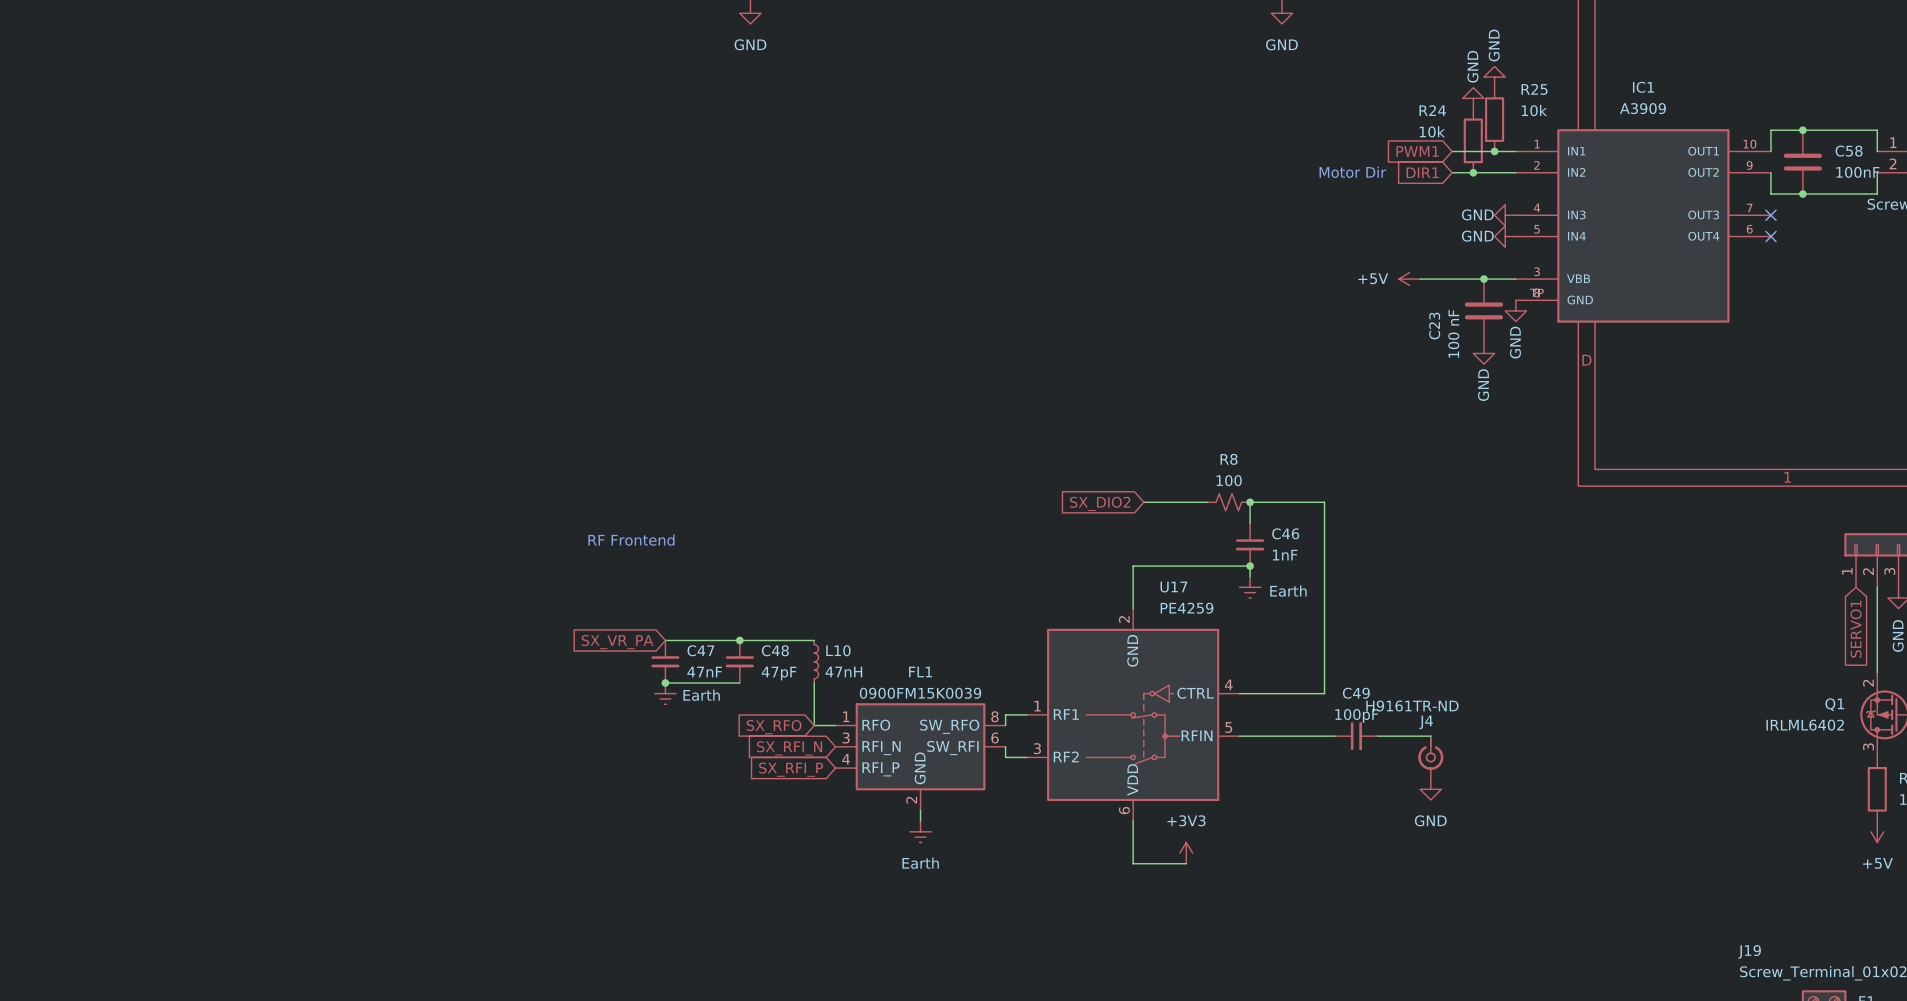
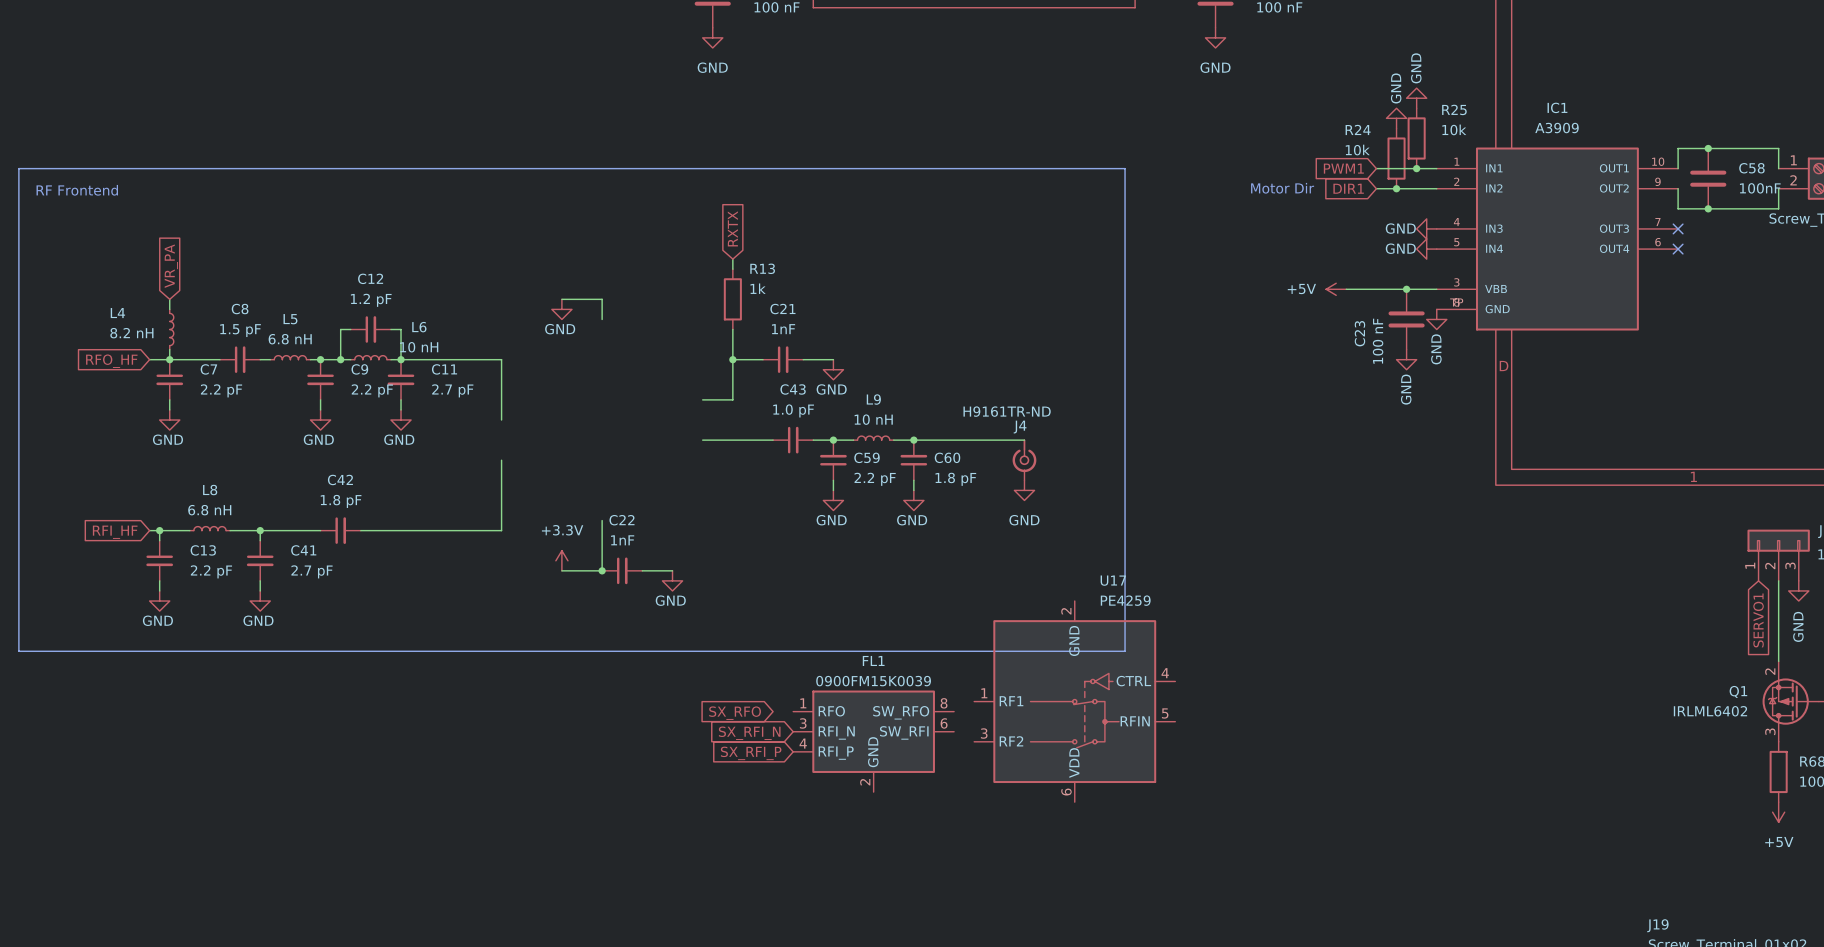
line: none -> (18, 168) (1125, 168) (1125, 651) (18, 651) (18, 168)
text: none -> RF Frontend (77, 190)
global label: none -> RXTX (732, 228)
wire: none -> (732, 259) (732, 269)
global label: none -> VR_PA (171, 266)
wire: none -> (169, 299) (169, 309)
wire: none -> (561, 299) (602, 299) (602, 319)
R13: none -> 1k (732, 299)
power symbol: none -> GND (561, 309)
L4: none -> 8.2 nH (171, 329)
wire: none -> (350, 329) (340, 329) (340, 359)
C12: none -> 1.2 pF (370, 329)
wire: none -> (390, 329) (401, 329) (401, 359)
wire: none -> (732, 329) (732, 399) (702, 399)
wire: none -> (169, 349) (169, 359)
L5: none -> 6.8 nH (290, 357)
L6: none -> 10 nH (370, 357)
wire: none -> (149, 359) (220, 359)
junction: none -> (169, 359)
C8: none -> 1.5 pF (240, 359)
wire: none -> (260, 359) (270, 359)
wire: none -> (310, 359) (350, 359)
junction: none -> (320, 359)
junction: none -> (340, 359)
wire: none -> (390, 359) (501, 359) (501, 420)
junction: none -> (401, 359)
wire: none -> (732, 359) (763, 359)
junction: none -> (732, 359)
C21: none -> 1nF (783, 359)
wire: none -> (803, 359) (833, 359)
global label: none -> RFO_HF (111, 361)
power symbol: none -> GND (833, 369)
C7: none -> 2.2 pF (169, 379)
C9: none -> 2.2 pF (320, 379)
C11: none -> 2.7 pF (401, 379)
wire: none -> (169, 399) (169, 409)
wire: none -> (320, 399) (320, 409)
wire: none -> (401, 399) (401, 409)
power symbol: none -> GND (169, 420)
power symbol: none -> GND (320, 420)
power symbol: none -> GND (401, 420)
L9: none -> 10 nH (873, 438)
wire: none -> (702, 440) (773, 440)
C43: none -> 1.0 pF (793, 440)
wire: none -> (813, 440) (853, 440)
junction: none -> (833, 440)
wire: none -> (893, 440) (1024, 440)
junction: none -> (913, 440)
wire: none -> (501, 460) (501, 530) (360, 530)
C59: none -> 2.2 pF (833, 460)
C60: none -> 1.8 pF (913, 460)
wire: none -> (833, 480) (833, 490)
wire: none -> (913, 480) (913, 490)
power symbol: none -> GND (1024, 490)
power symbol: none -> GND (833, 500)
power symbol: none -> GND (913, 500)
wire: (1143, 502) (1207, 502) -> none
R8: 100 (1228, 502) -> none
junction: (1250, 502) -> none
global label: SX_DIO2 (1100, 503) -> none
wire: none -> (602, 520) (602, 570) (561, 570)
wire: (1250, 523) (1250, 502) (1324, 502) (1324, 693) (1239, 693) -> none
L8: none -> 6.8 nH (209, 528)
wire: none -> (149, 530) (189, 530)
wire: none -> (159, 530) (159, 540)
junction: none -> (159, 530)
wire: none -> (230, 530) (320, 530)
wire: none -> (260, 530) (260, 540)
junction: none -> (260, 530)
C42: none -> 1.8 pF (340, 530)
global label: none -> RFI_HF (115, 532)
text: RF Frontend (631, 540) -> none
C46: 1nF (1250, 544) -> none
C13: none -> 2.2 pF (159, 560)
C41: none -> 2.7 pF (260, 560)
power symbol: none -> +3.3V (561, 560)
junction: (1250, 566) -> none
junction: none -> (602, 570)
C22: none -> 1nF (622, 570)
wire: none -> (642, 570) (672, 570)
wire: (1250, 576) (1250, 566) (1133, 566) (1133, 608) -> none
wire: none -> (159, 580) (159, 590)
wire: none -> (260, 580) (260, 590)
power symbol: none -> GND (672, 580)
power symbol: Earth (1250, 587) -> none
power symbol: none -> GND (159, 601)
power symbol: none -> GND (260, 601)
wire: (665, 640) (814, 640) -> none
junction: (739, 640) -> none
global label: SX_VR_PA (617, 642) -> none
C47: 47nF (665, 661) -> none
C48: 47pF (739, 661) -> none
L10: 47nH (816, 661) -> none
wire: (665, 683) (739, 683) -> none
junction: (665, 683) -> none
wire: (814, 683) (814, 725) (835, 725) -> none
power symbol: Earth (665, 693) -> none
wire: (1026, 714) (1005, 714) (1005, 725) -> none
wire: (1239, 736) (1335, 736) -> none
C49: 100pF (1356, 736) -> none
wire: (1377, 736) (1430, 736) -> none
wire: (1005, 746) (1005, 757) (1026, 757) -> none
J4 position: (1430, 757) -> (1024, 460)
power symbol: GND (1430, 789) -> none
wire: (920, 810) (920, 821) -> none
wire: (1133, 821) (1133, 863) (1186, 863) -> none
power symbol: Earth (920, 831) -> none
power symbol: +3V3 (1186, 853) -> none

